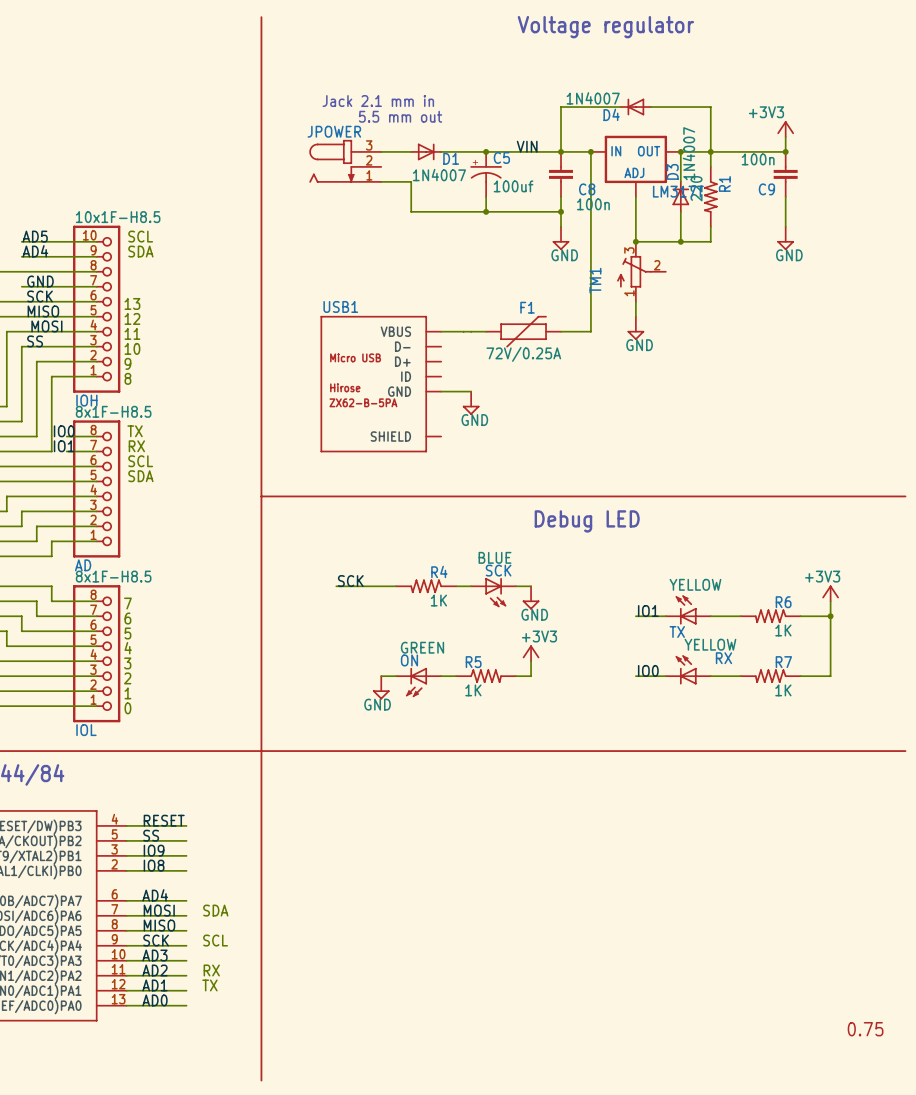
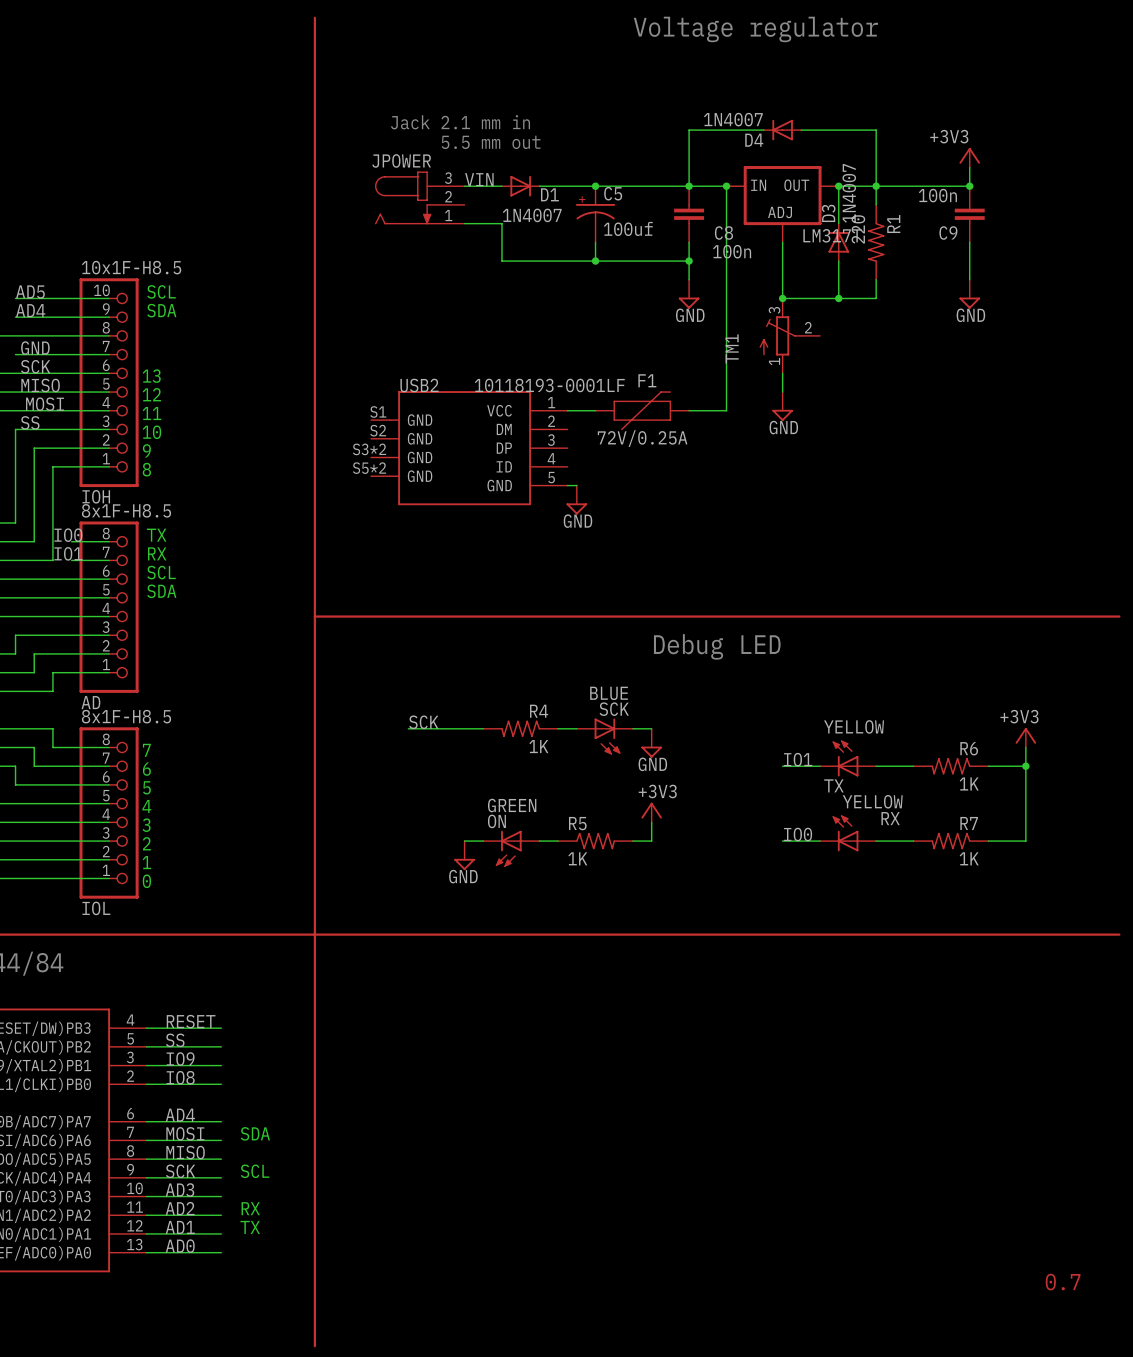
label position: VIN (527, 146) -> VIN (479, 179)
USB2: none -> 10118193-0001LF (469, 448)
USB1: (380, 384) -> none
text: 0.75 (865, 1029) -> 0.7 (1063, 1282)

